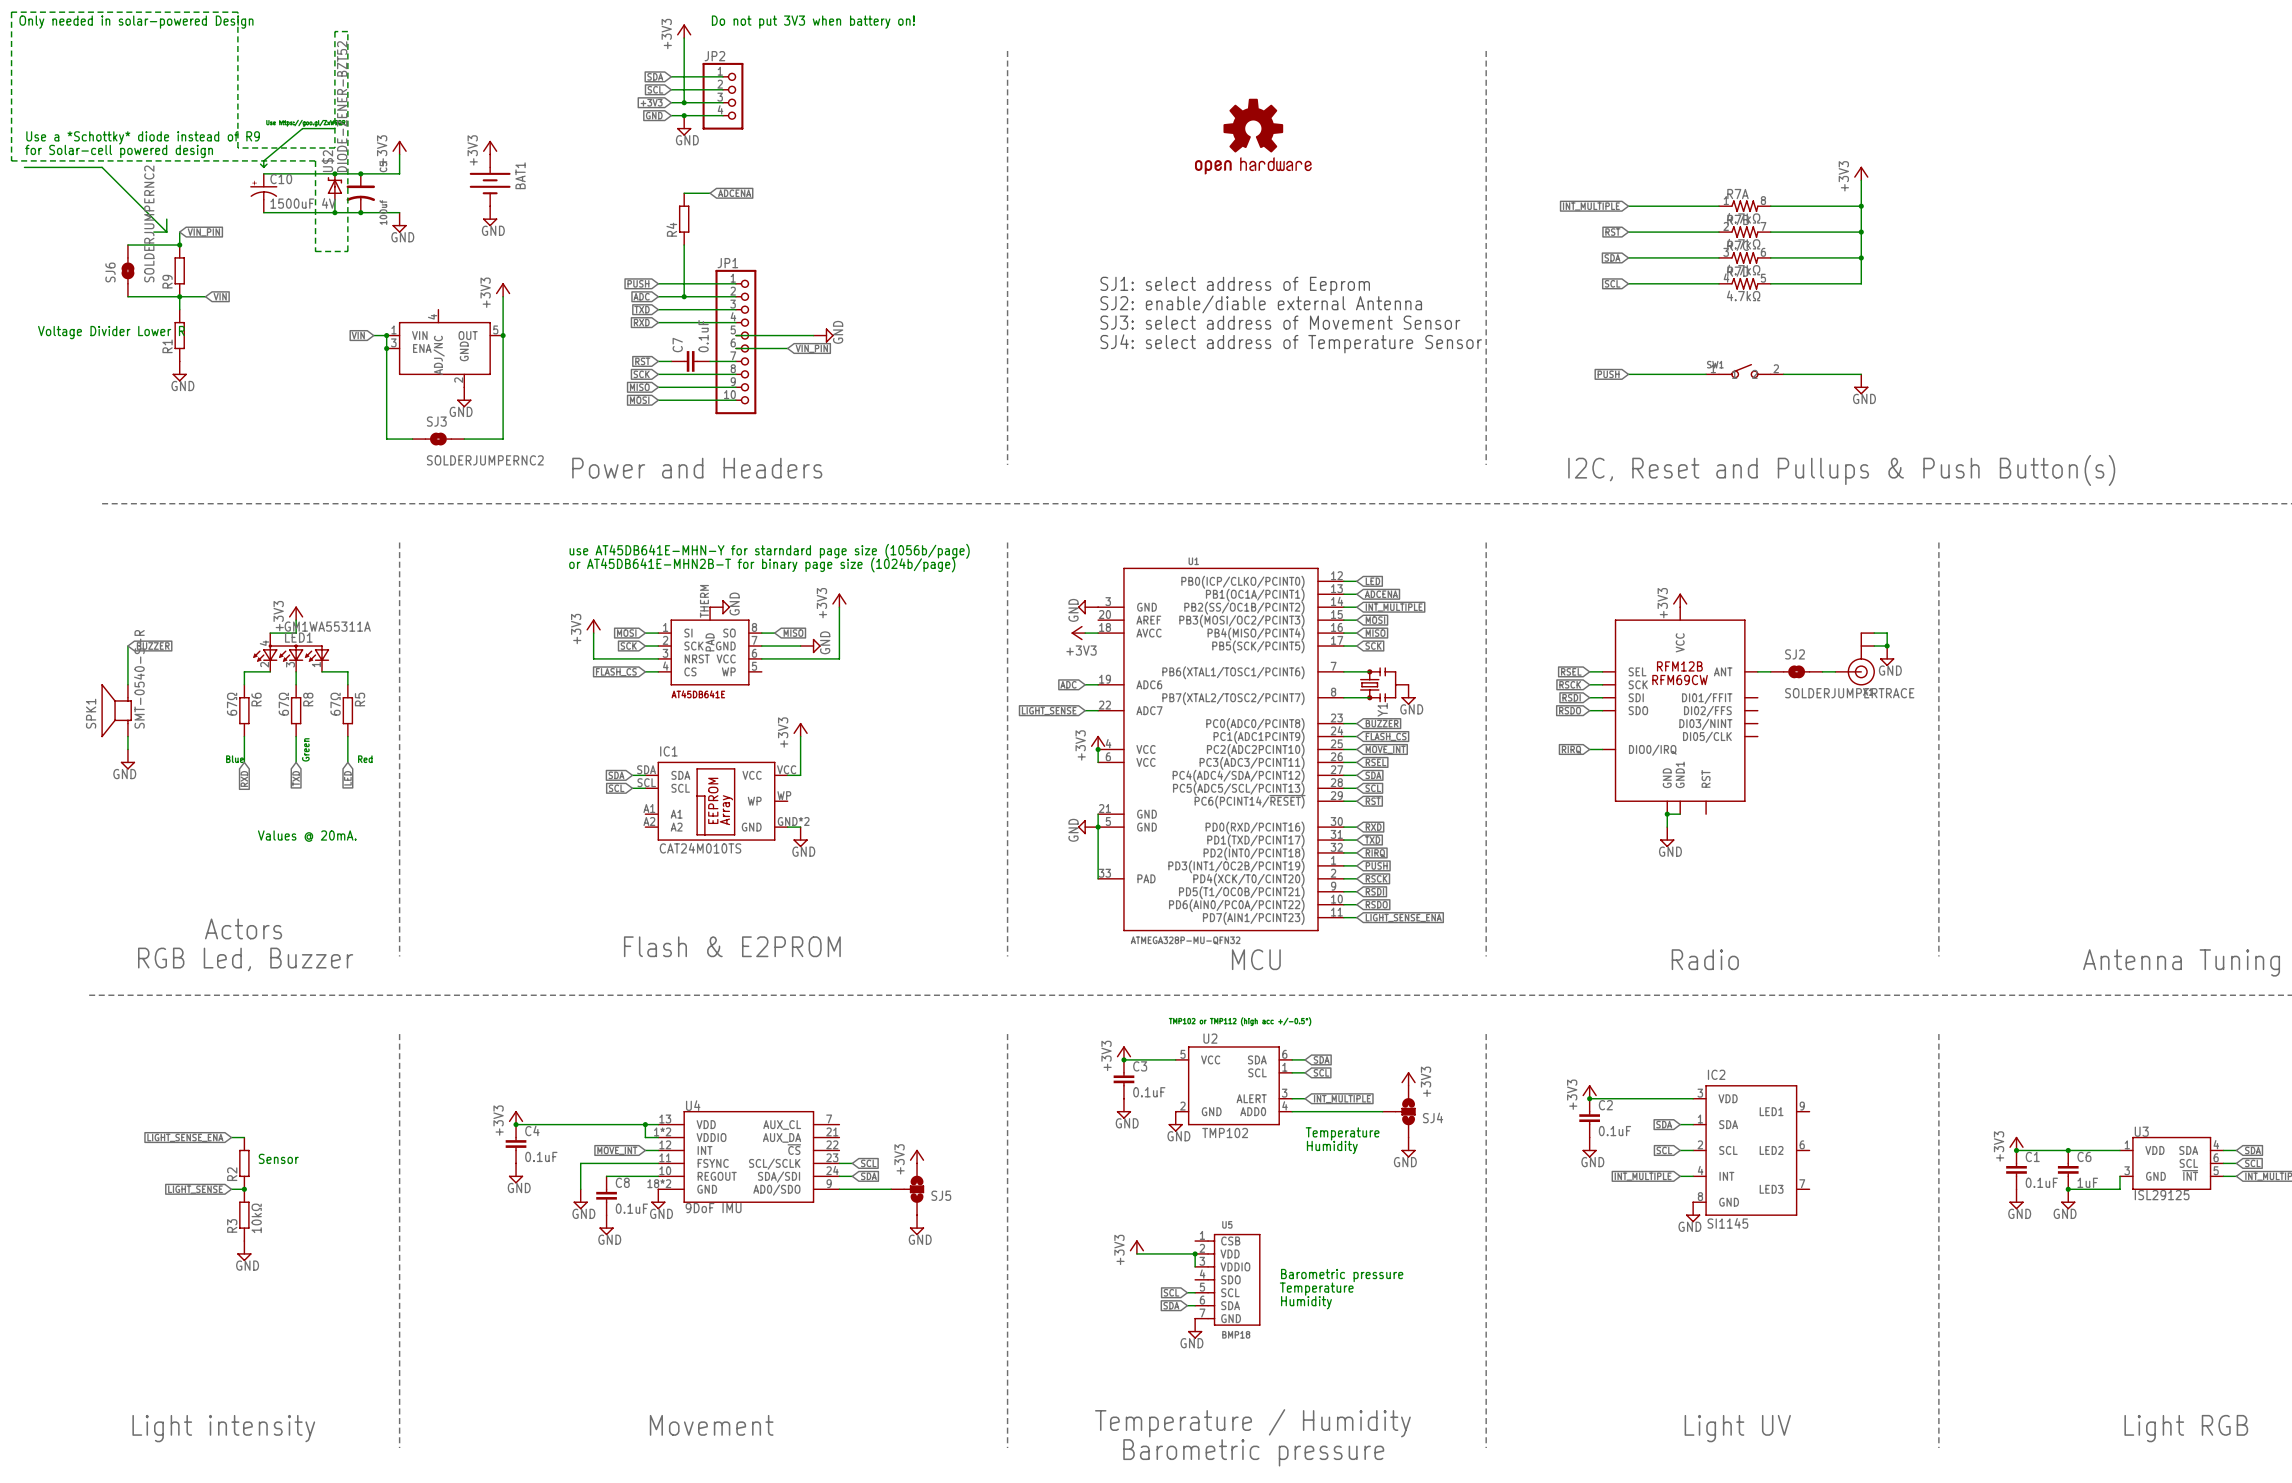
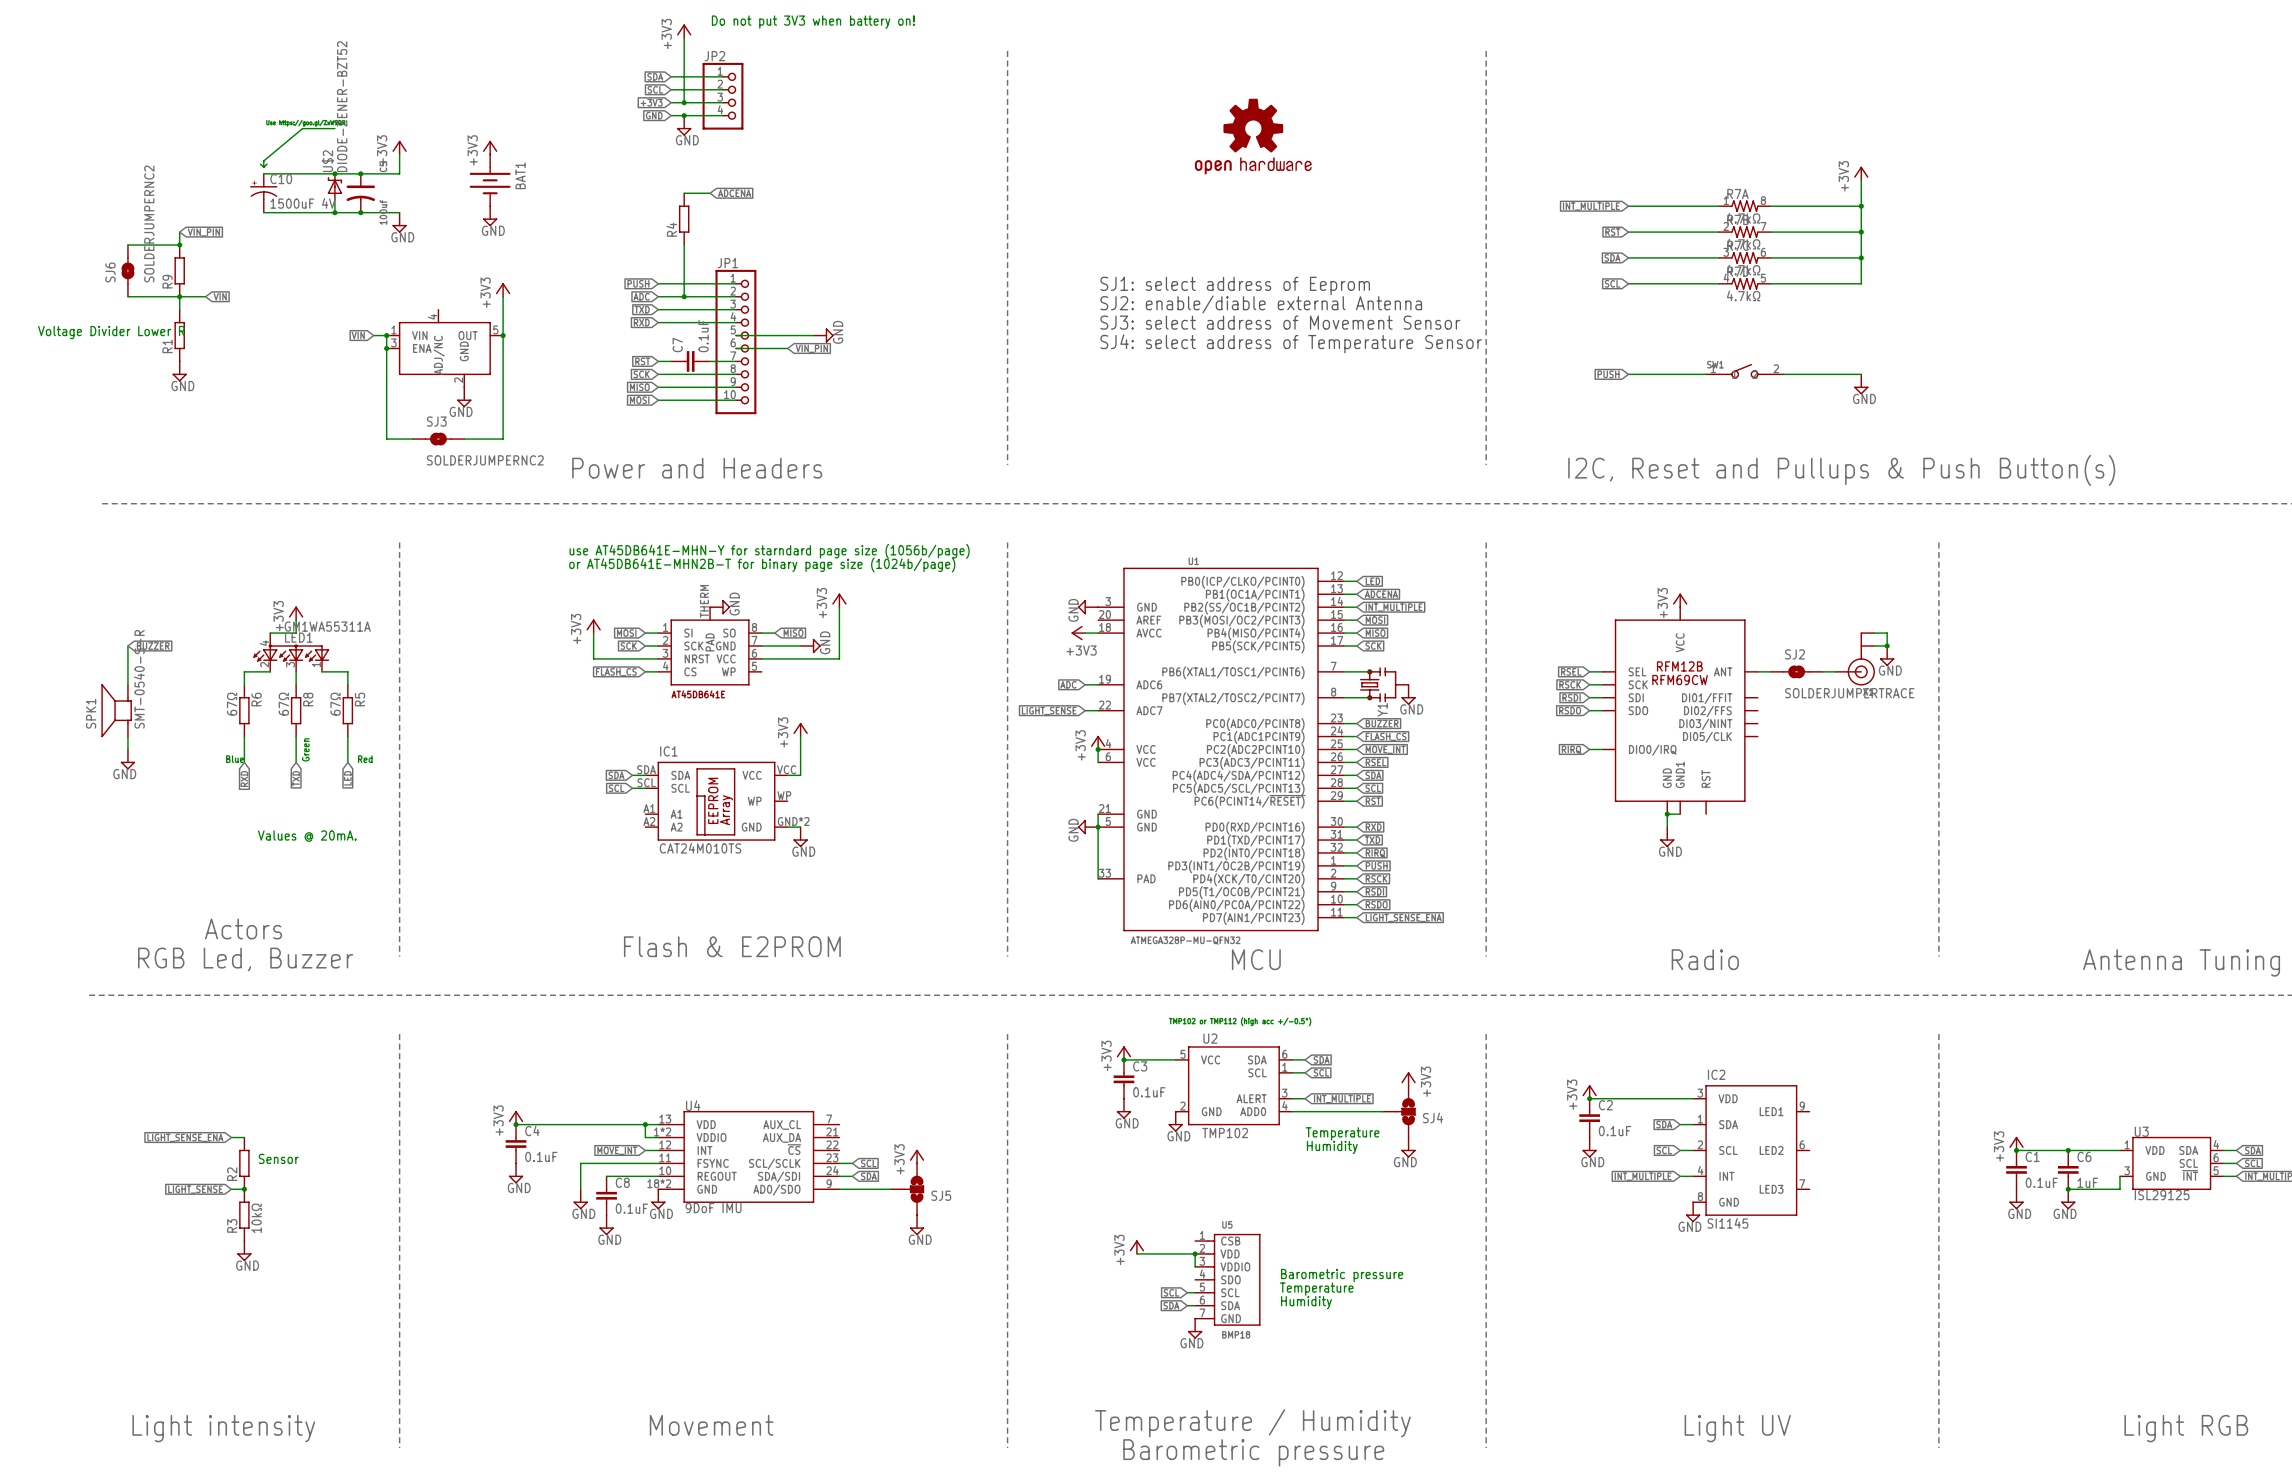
wire: (11, 12) (237, 12) (237, 147) (334, 147) (334, 31) (347, 31) (347, 251) (315, 251) (315, 160) (11, 160) (11, 12) -> none
text: Only needed in solar-powered Design (136, 22) -> none
text: Use a *Schottky* diode instead of R9 (143, 137) -> none
text: for Solar-cell powered design (119, 151) -> none
wire: (24, 167) (102, 167) (166, 232) -> none
wire: (166, 219) (166, 232) -> none
wire: (153, 232) (166, 232) -> none

